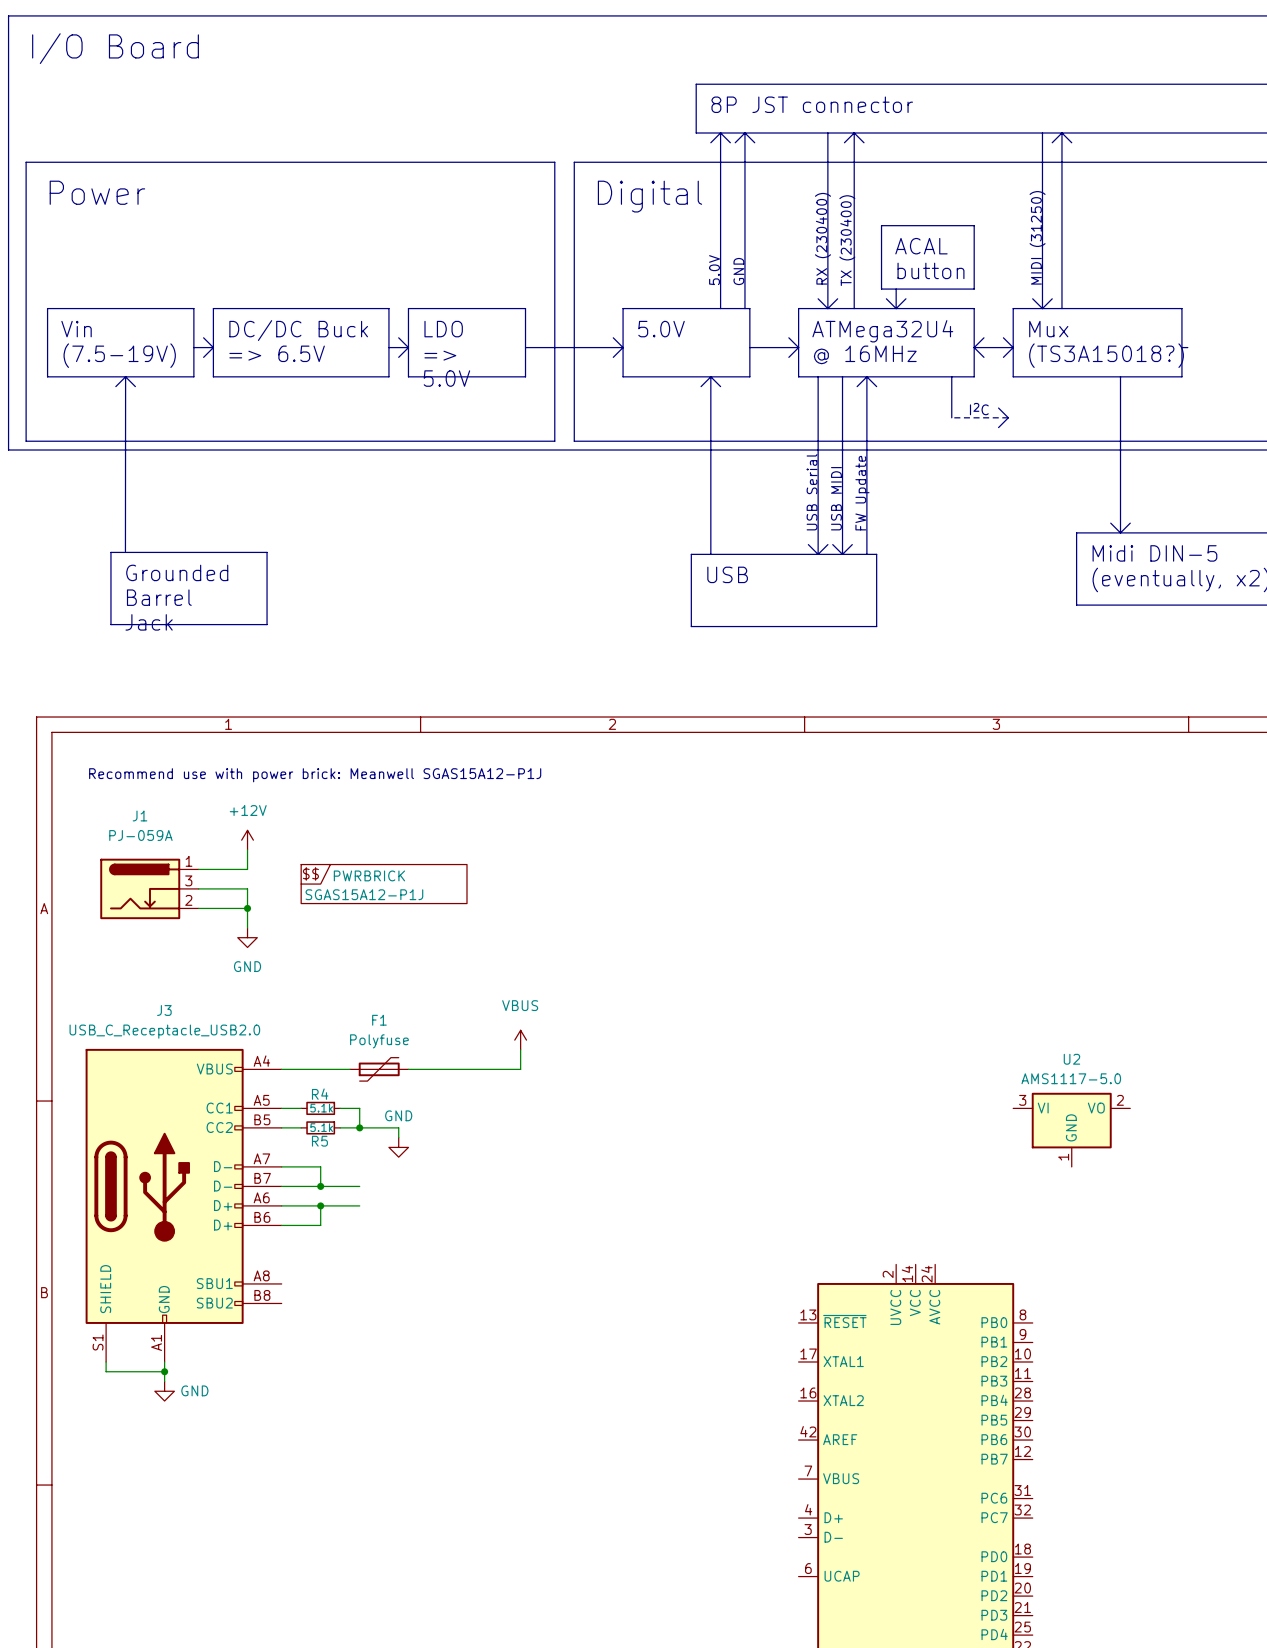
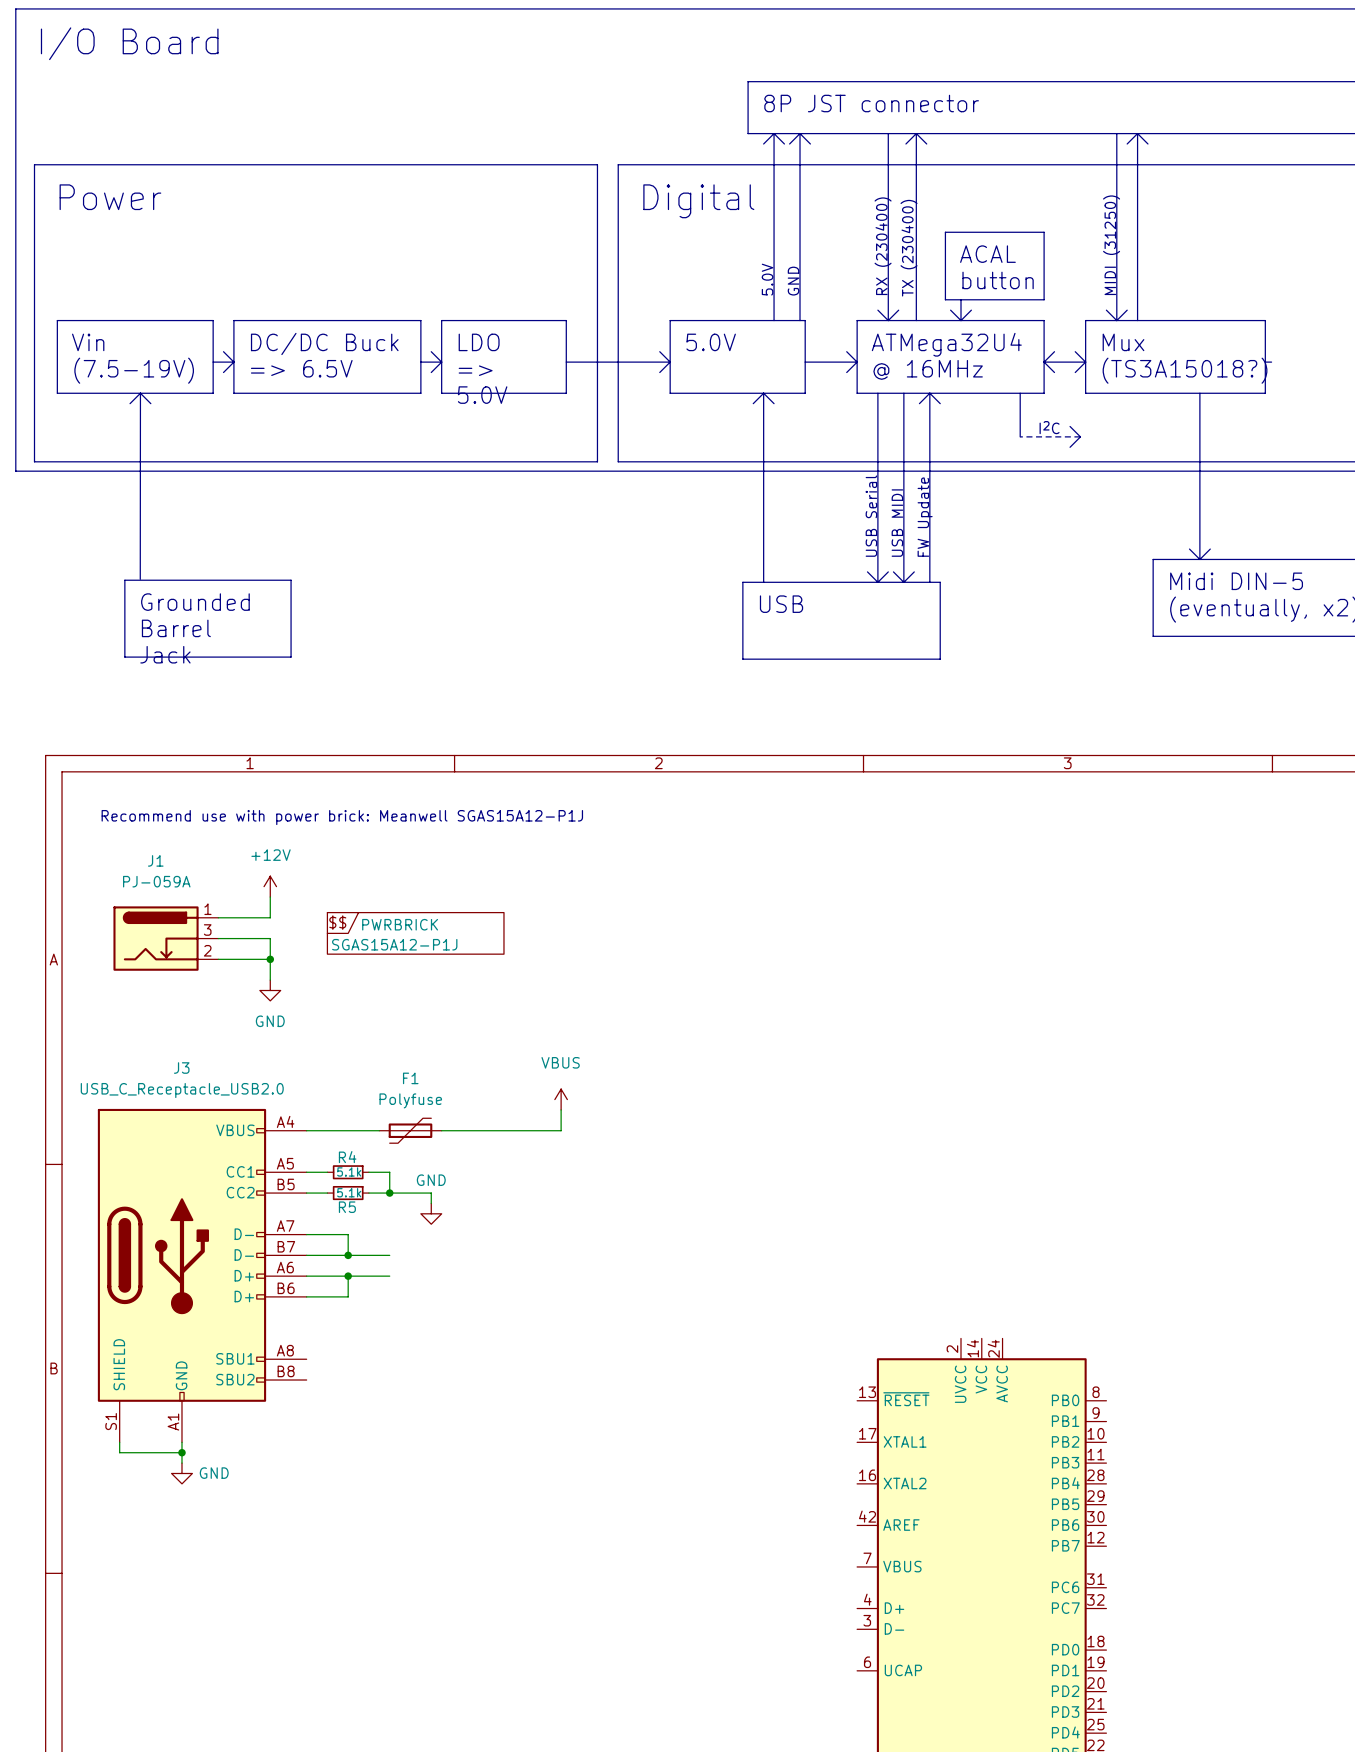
U2: AMS1117-5.0 (1071, 1129) -> none

